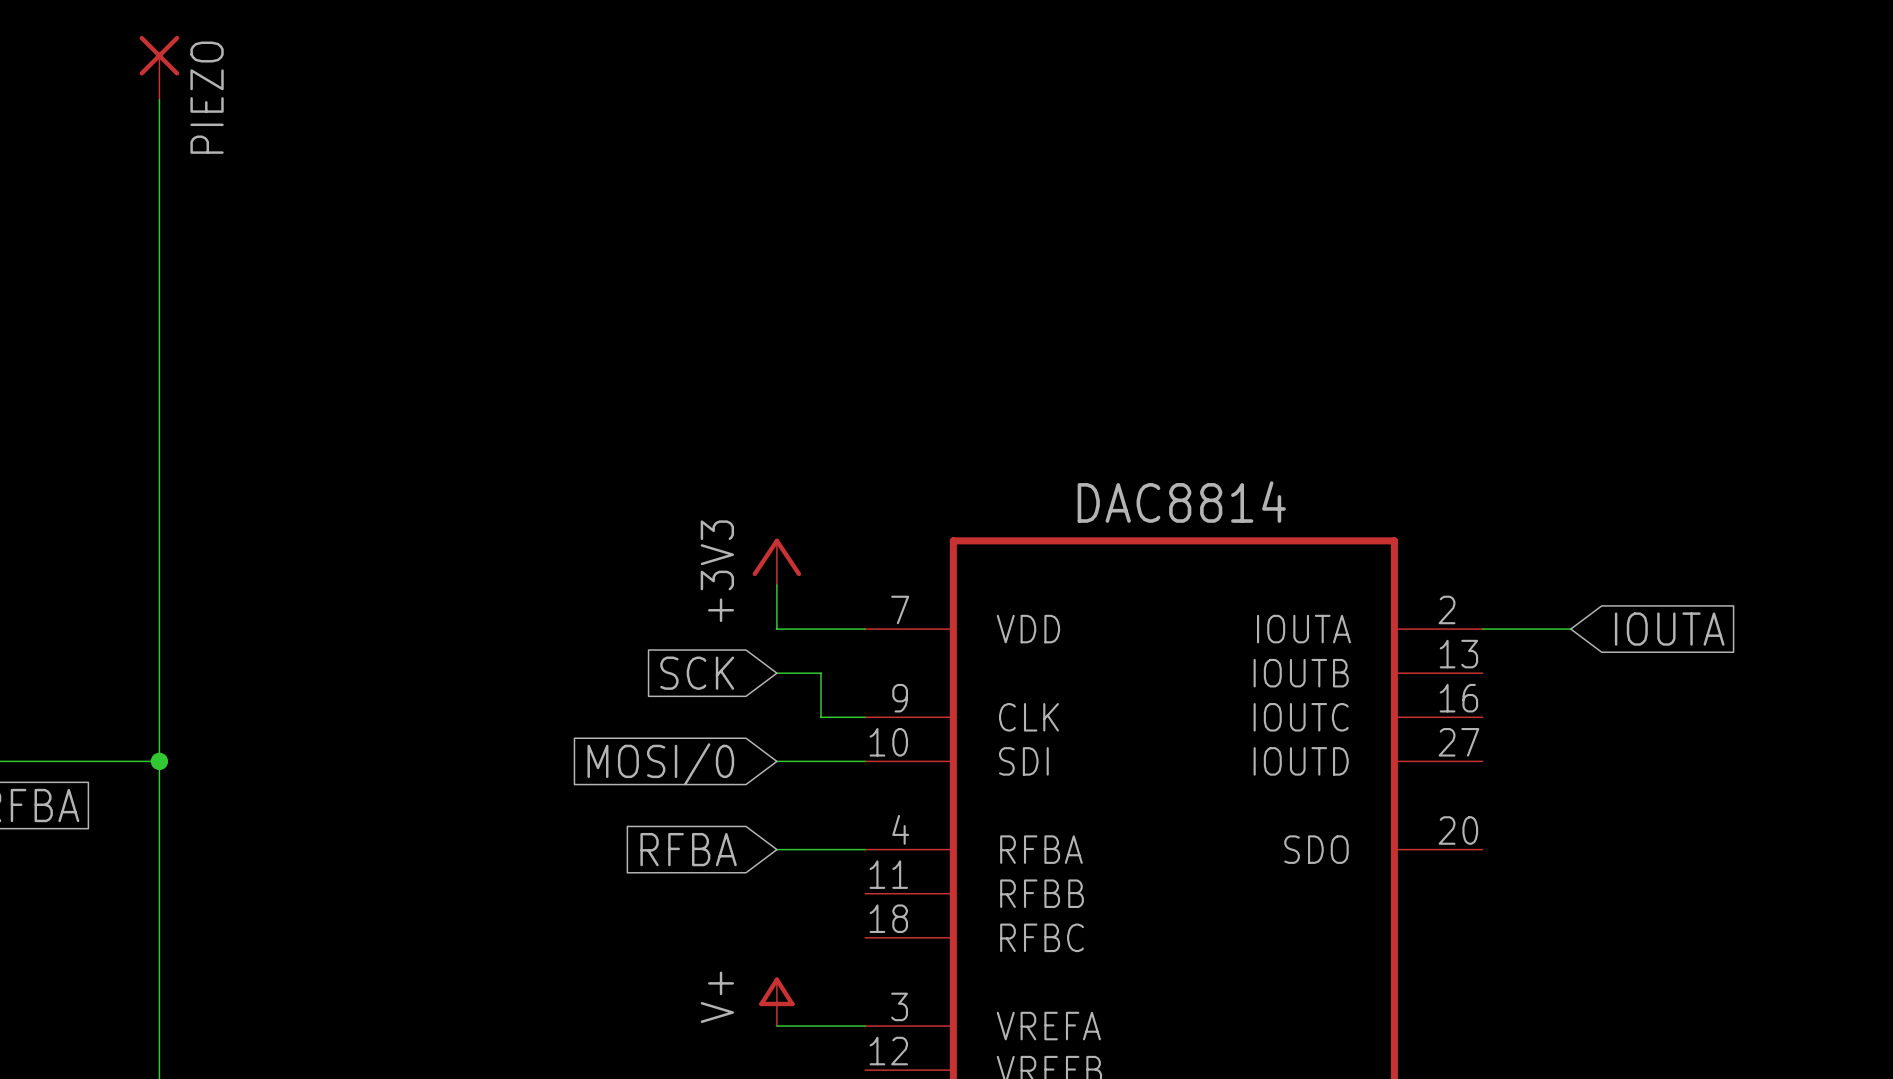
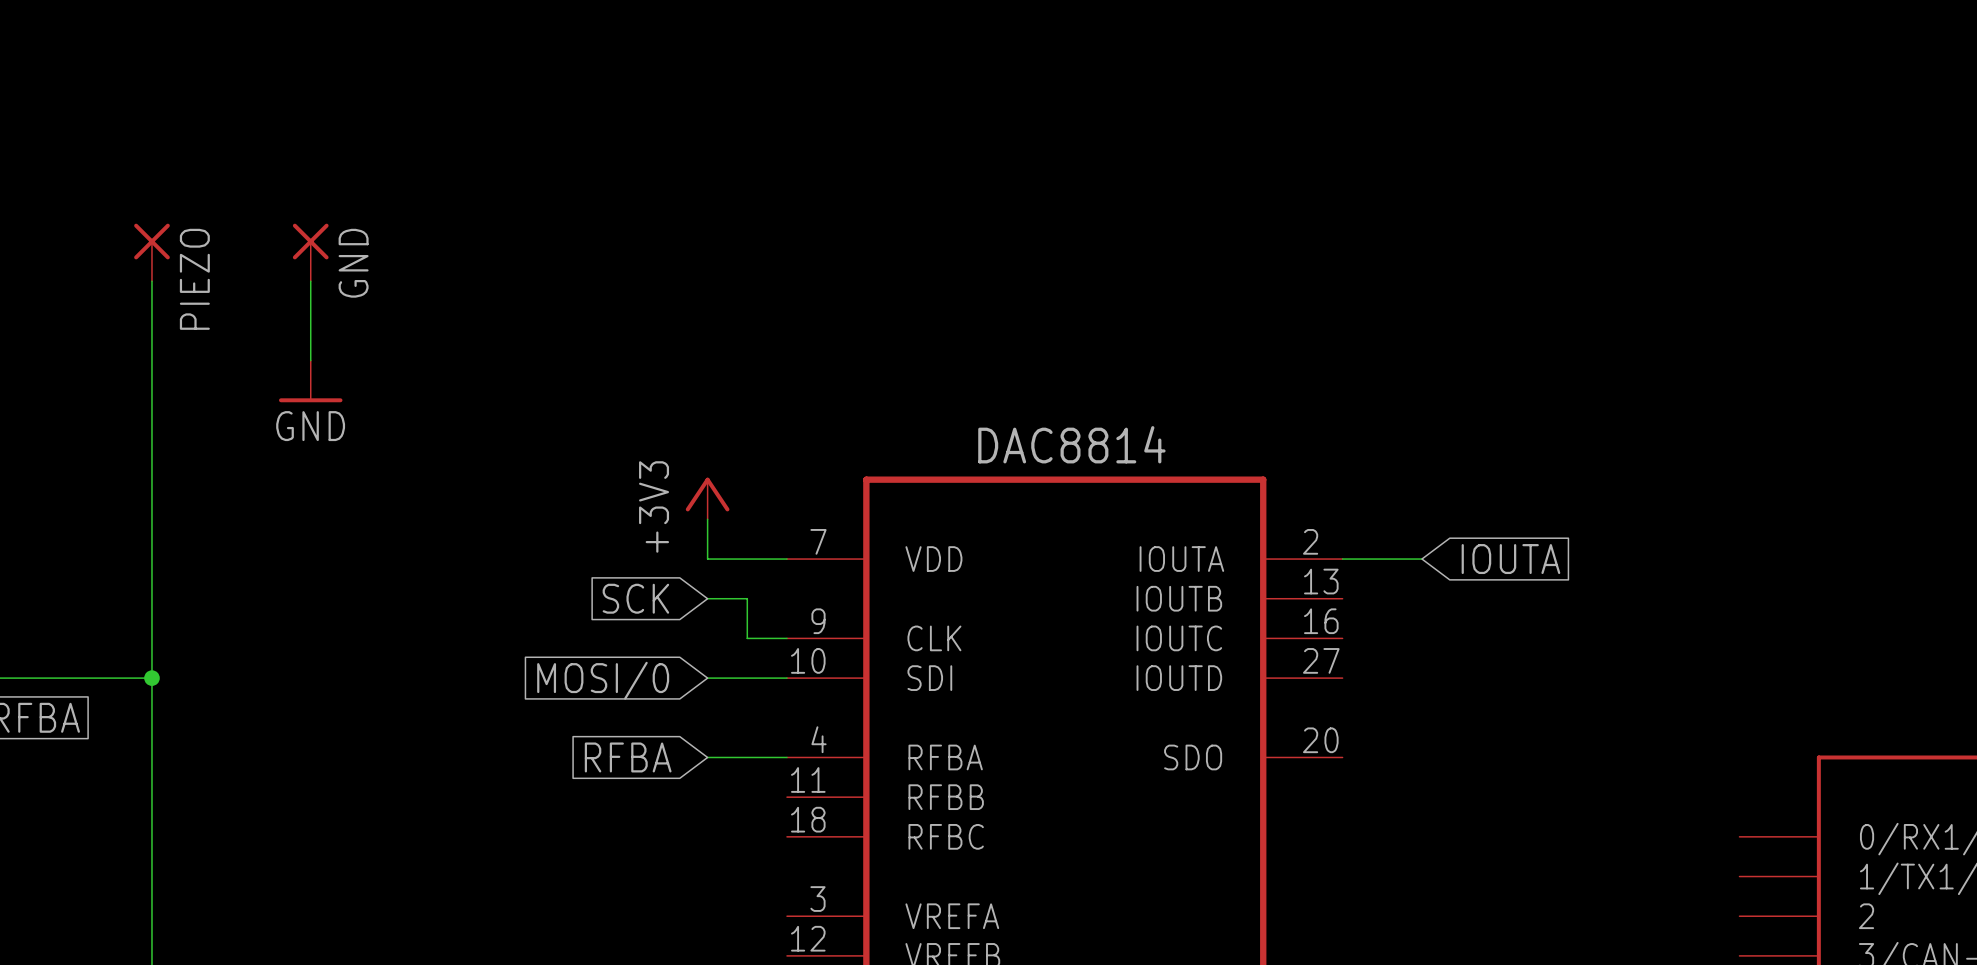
PIEZO position: (159, 67) -> (151, 252)
wire: (159, 99) (159, 320) -> none
GND: none -> (310, 252)
wire: none -> (310, 281) (310, 360)
power symbol: none -> GND (310, 381)
power symbol: V+ (776, 1001) -> none
wire: (776, 1026) (865, 1026) -> none

